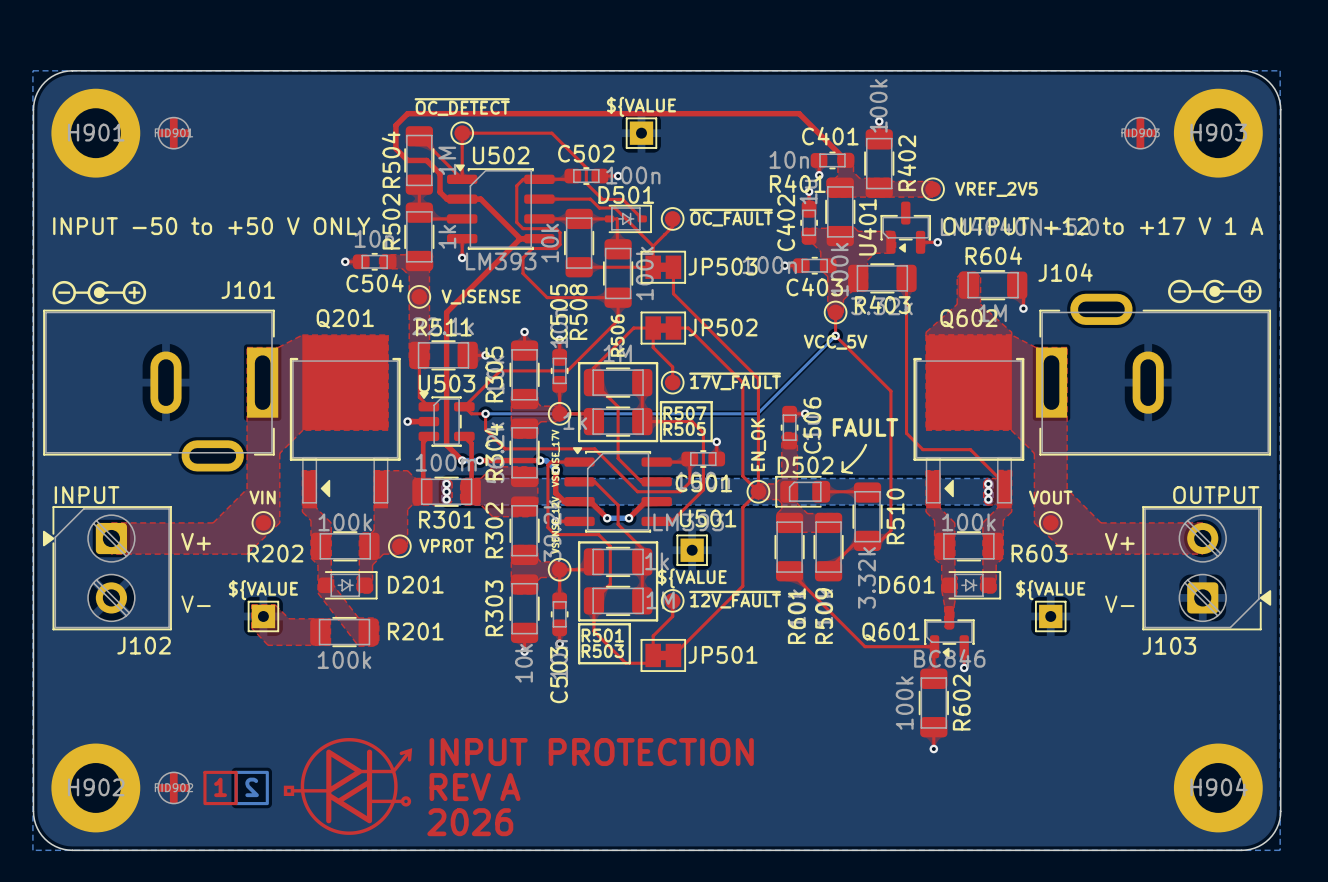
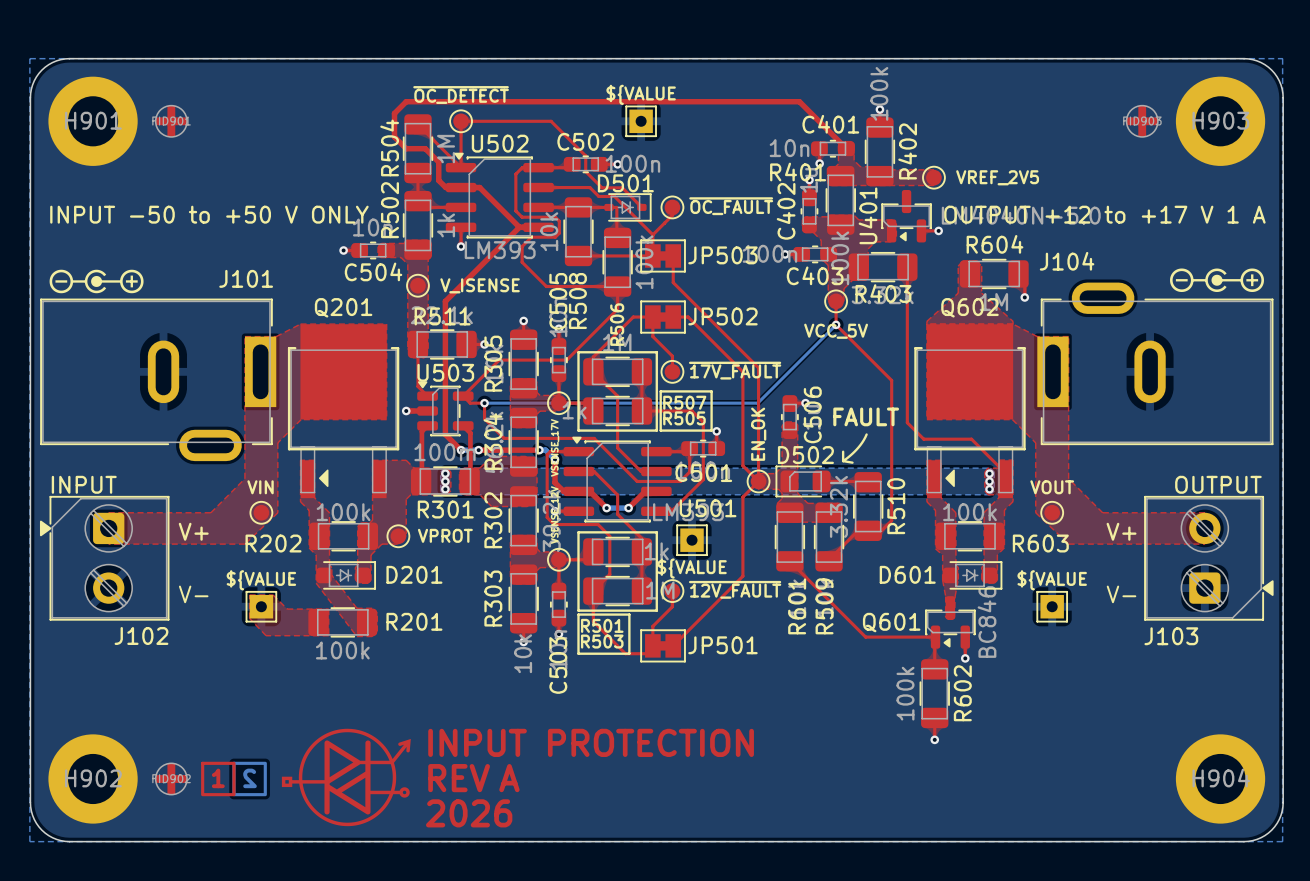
R510 value position: 3.32k (866, 577) -> 3.32k (838, 506)
Q601 value rotation: 0° (949, 658) -> 90° counterclockwise (987, 622)

